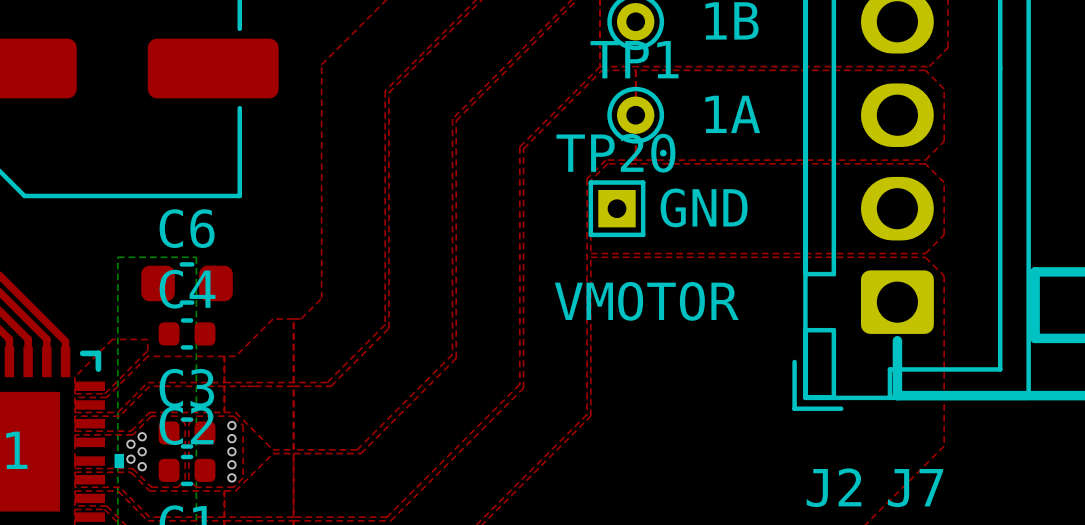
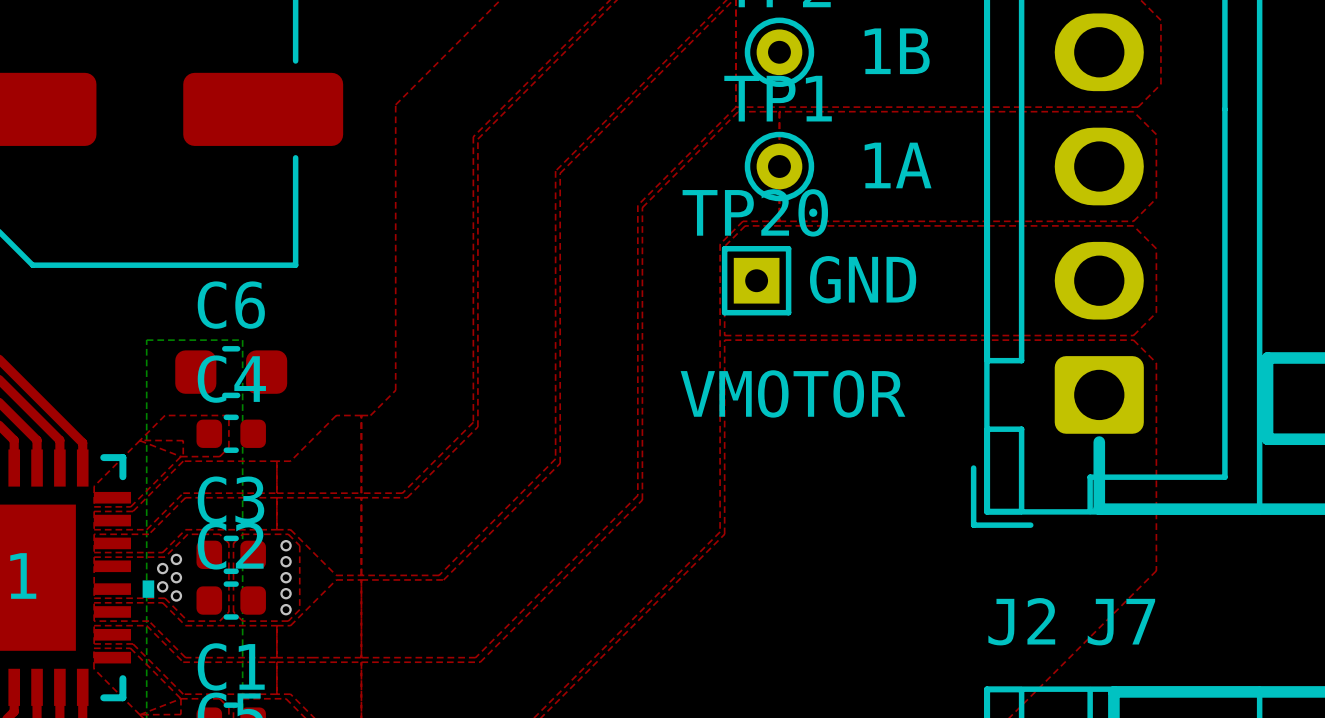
top zone outline: none -> (164, 415) (228, 415) (228, 447) (219, 456) (180, 456) (139, 440) (164, 415)

